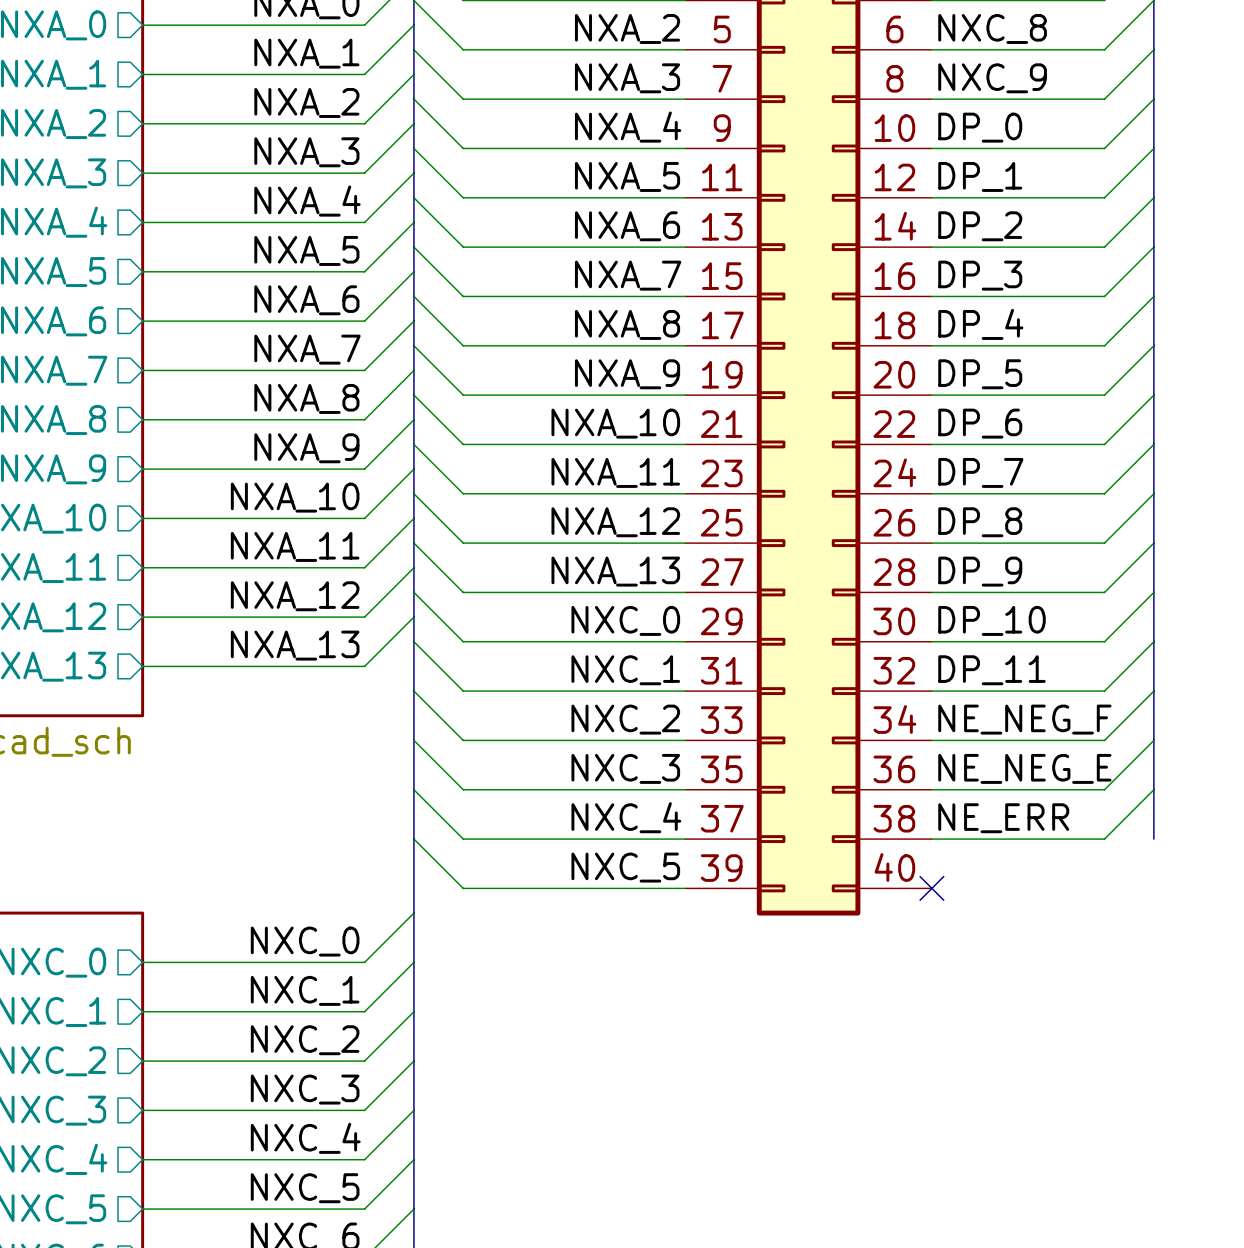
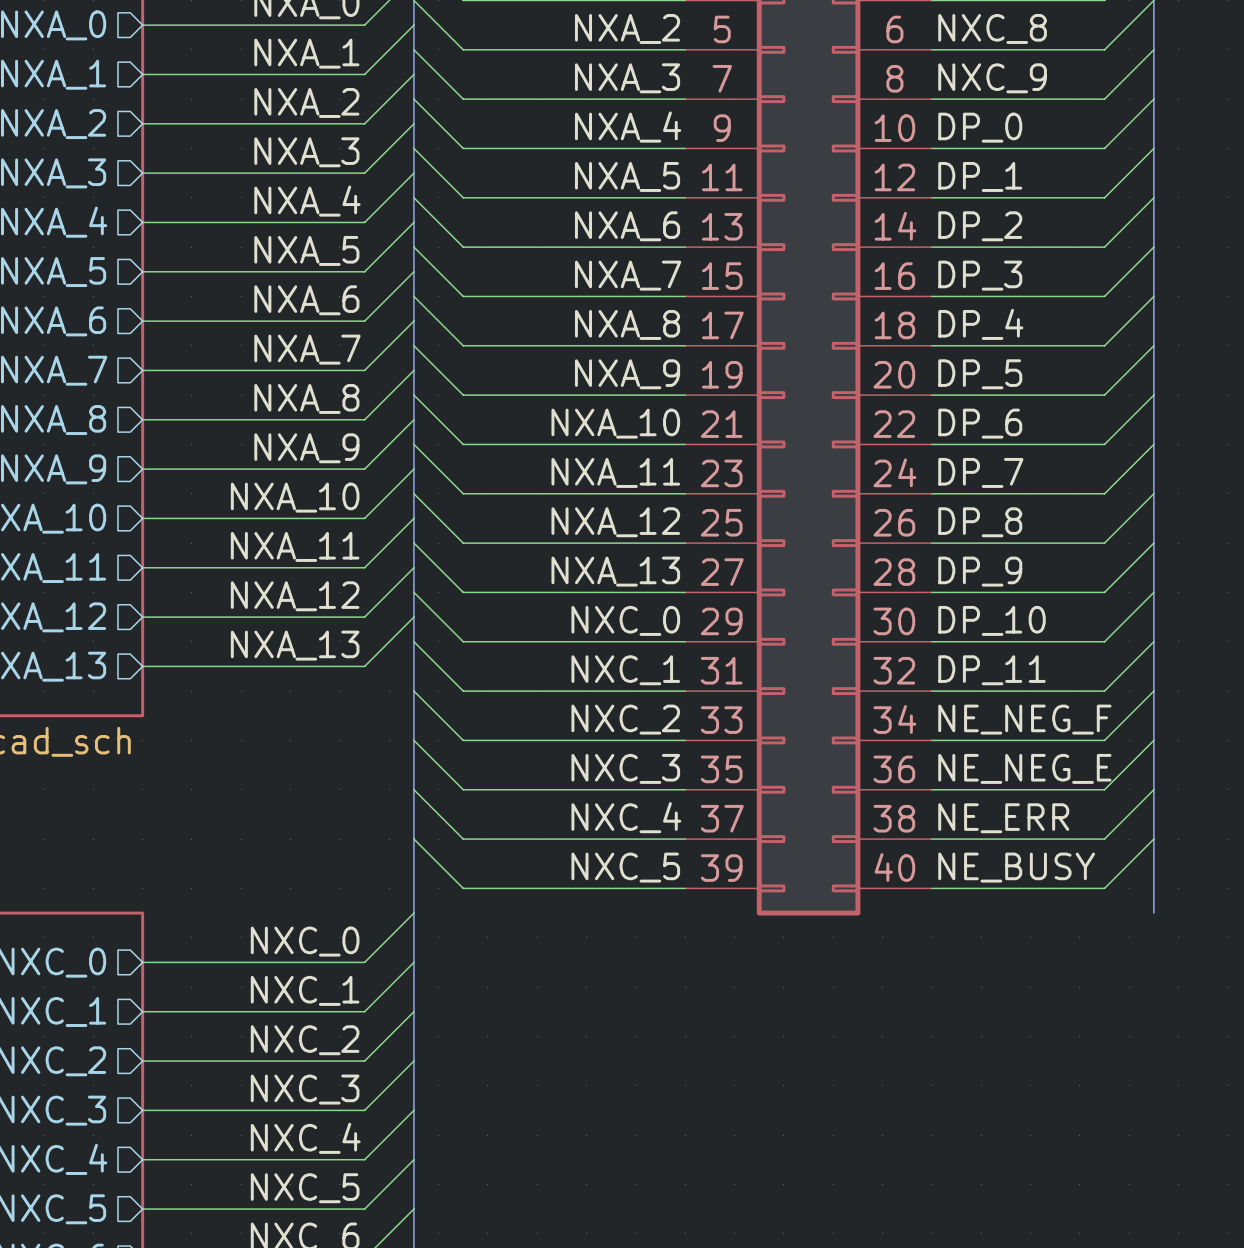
wire: none -> (1153, 839) (1104, 888) (931, 888)
bus: none -> (1153, 839) (1153, 913)
label: none -> NE_BUSY (1016, 867)
no-connect mark: (931, 888) -> none

